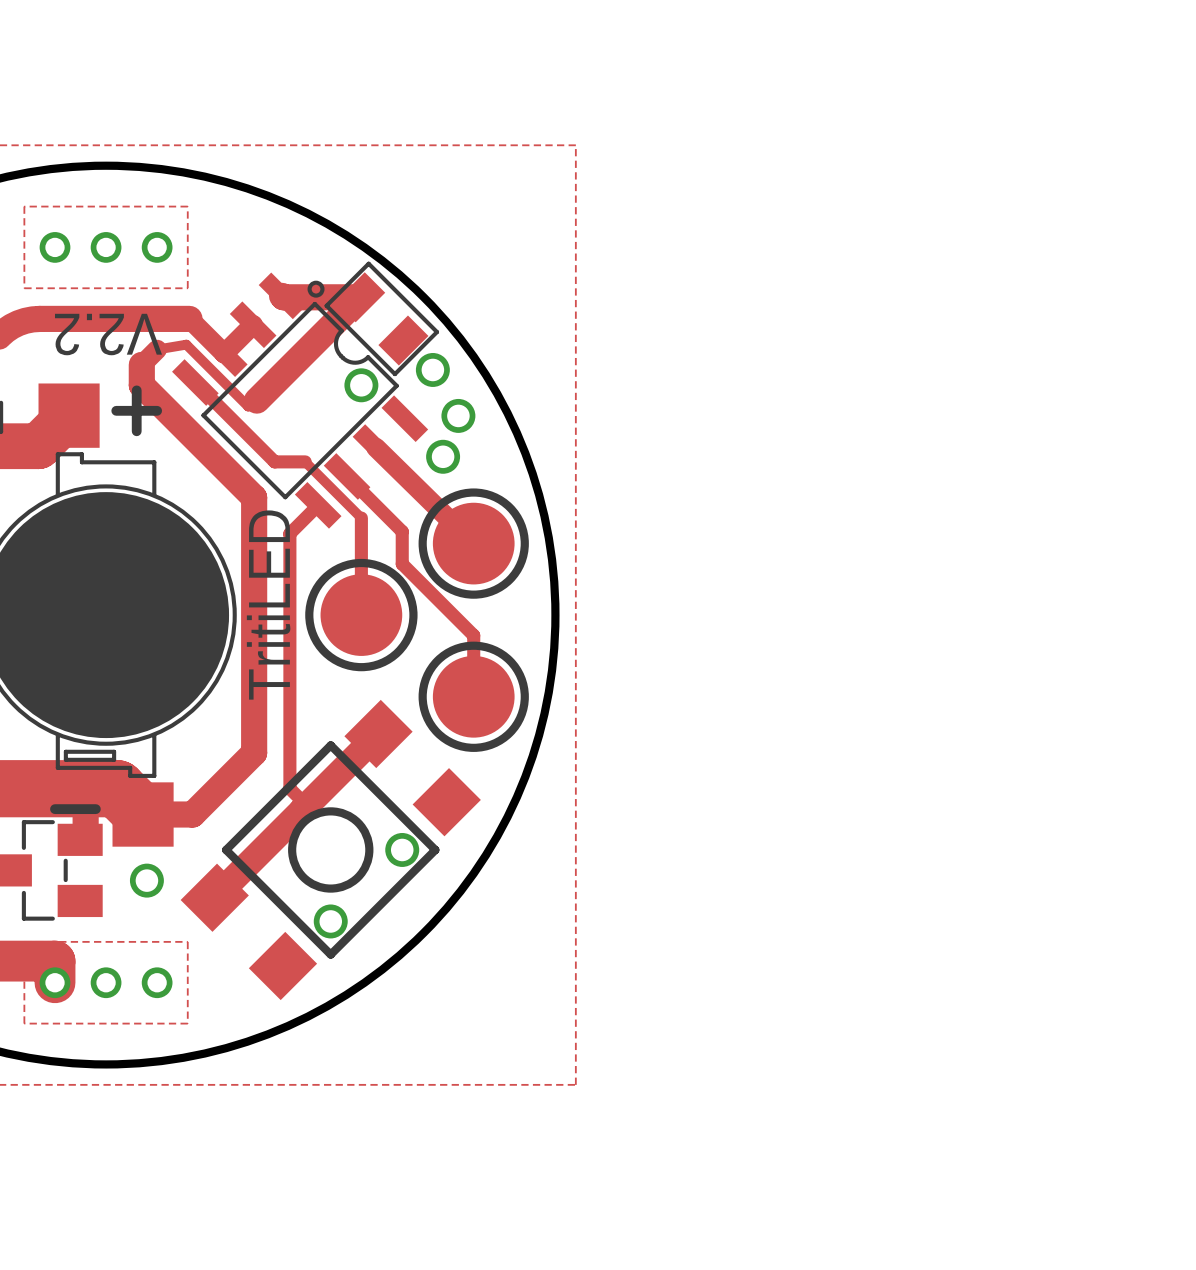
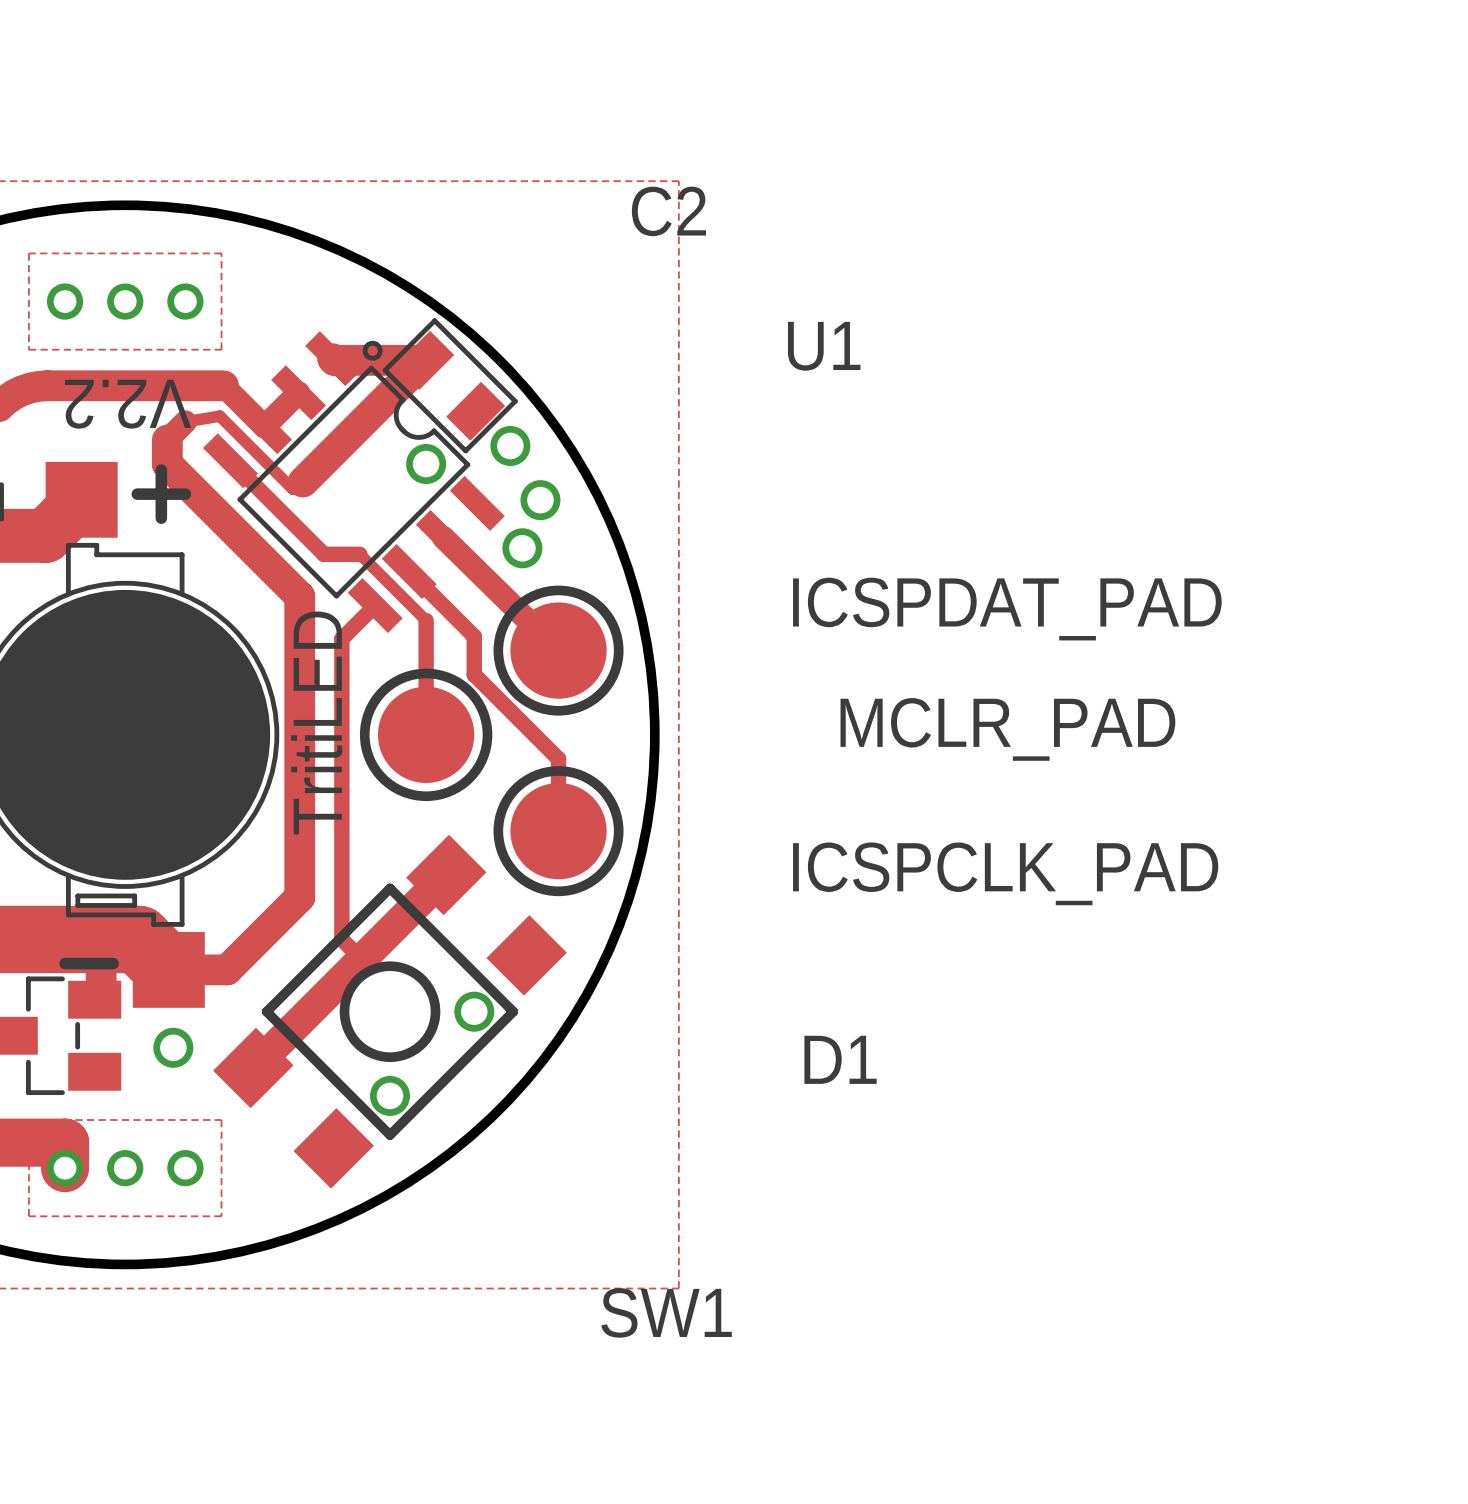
C2 name: none -> C2 (668, 211)
U1 name: none -> U1 (824, 346)
ICSPDAT_PAD name: none -> ICSPDAT_PAD (1007, 609)
MCLR_PAD name: none -> MCLR_PAD (1007, 729)
ICSPCLK_PAD name: none -> ICSPCLK_PAD (1005, 873)
D1 name: none -> D1 (840, 1059)
SW1 name: none -> SW1 (666, 1312)

